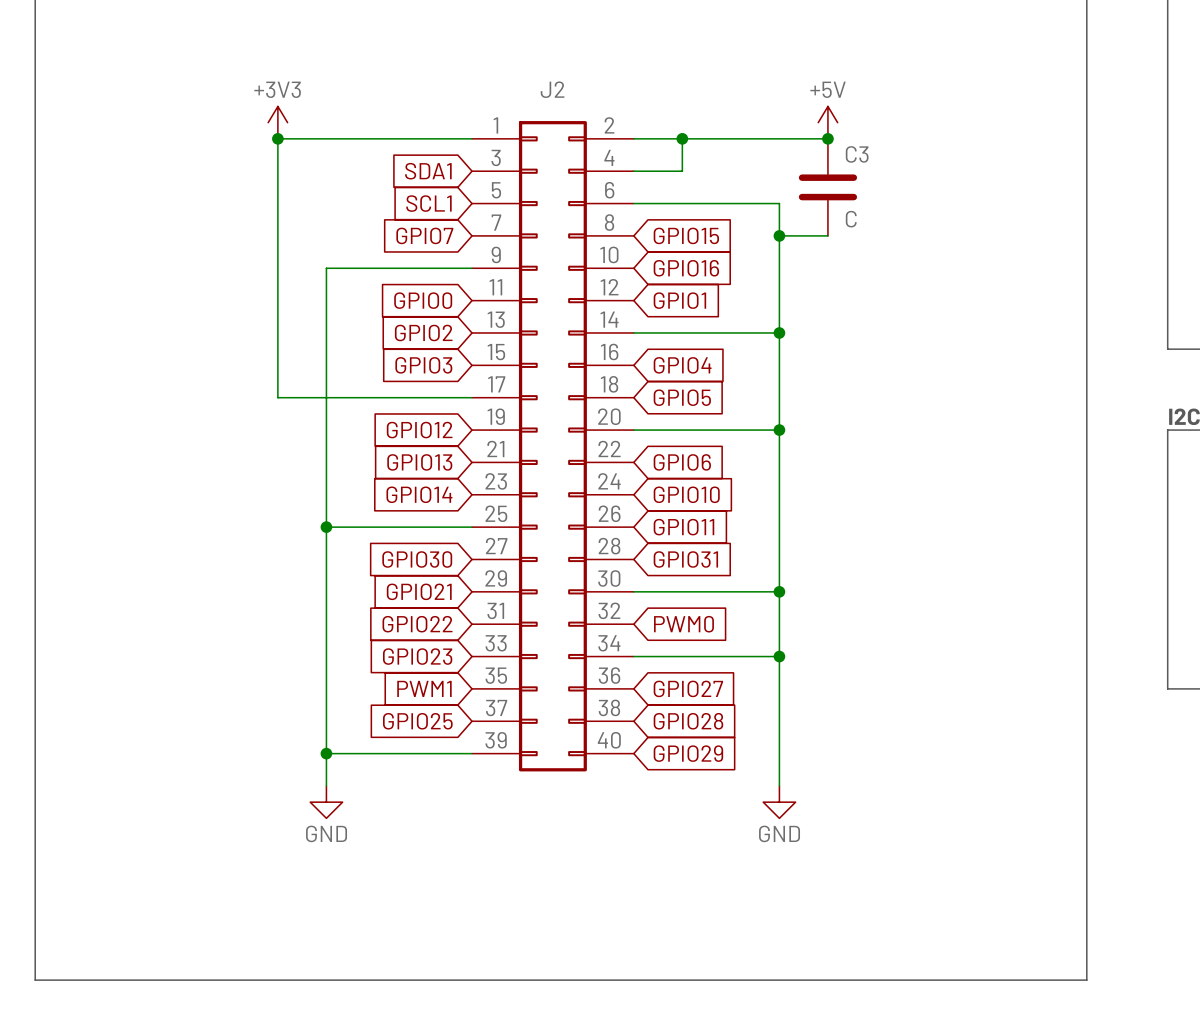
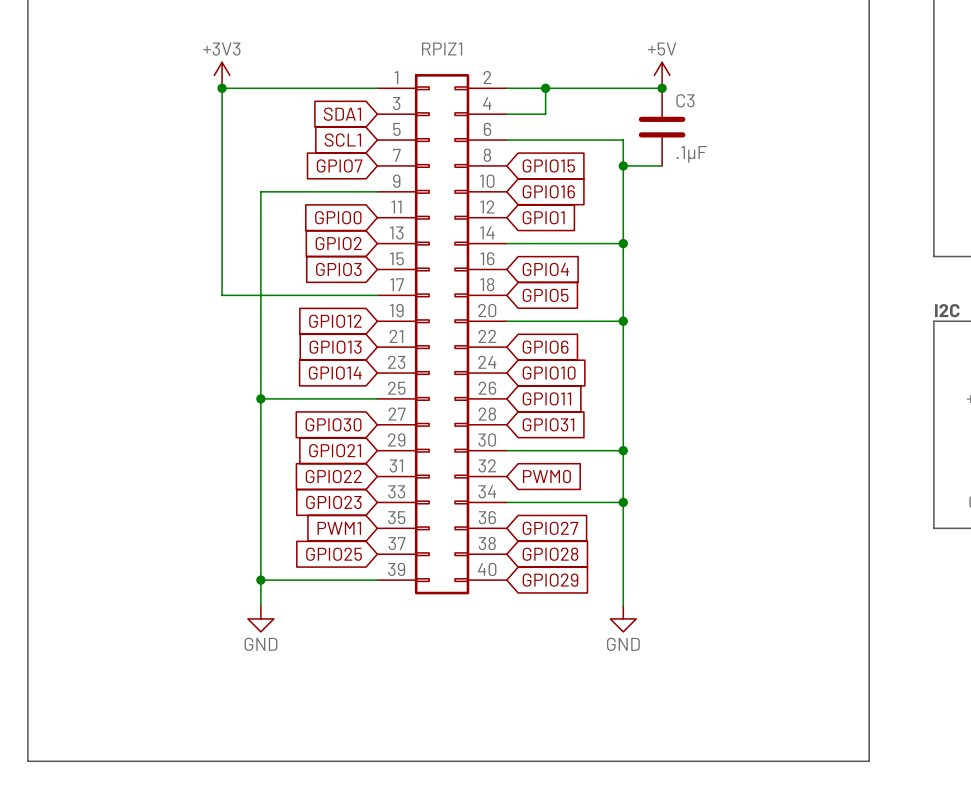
J2 name: J2 (552, 89) -> RPIZ1 (442, 48)
C3 value: C (851, 219) -> .1µF (691, 154)

